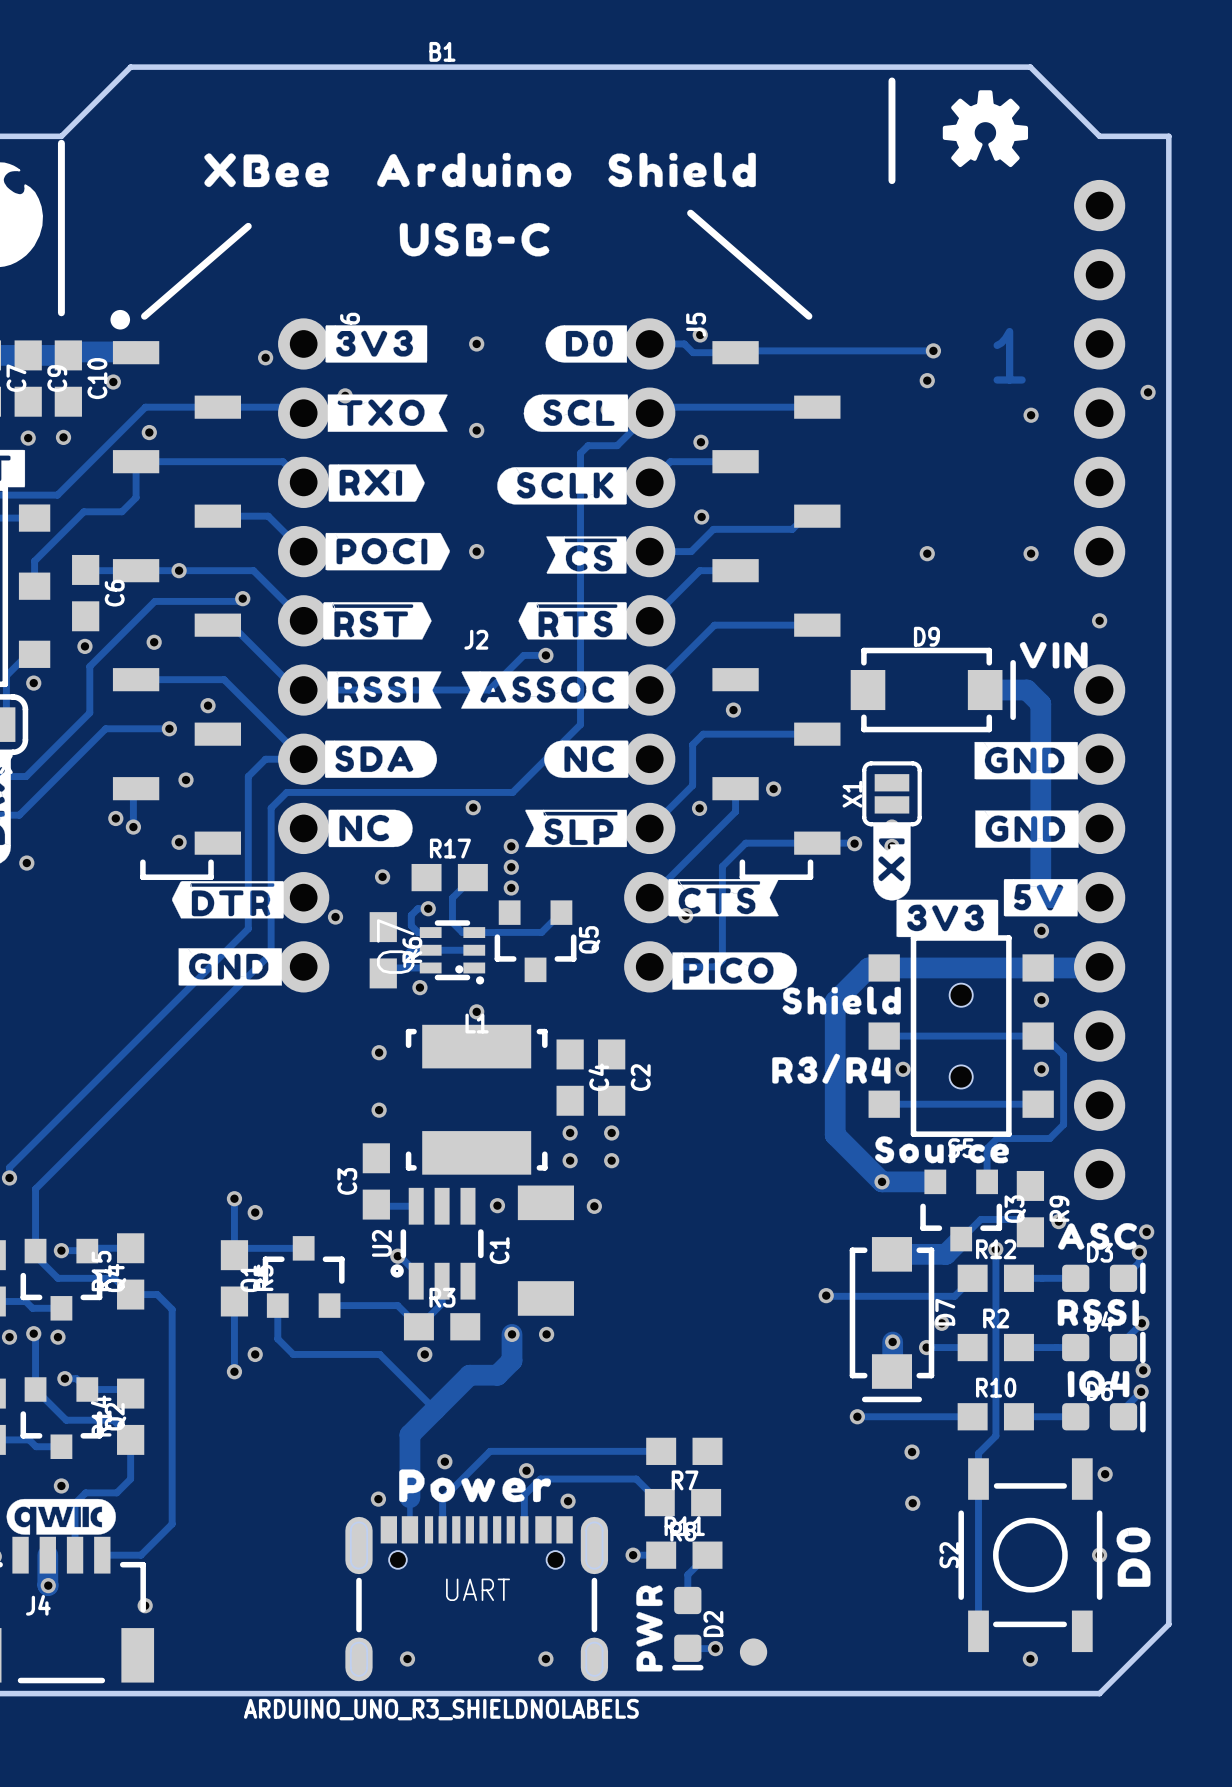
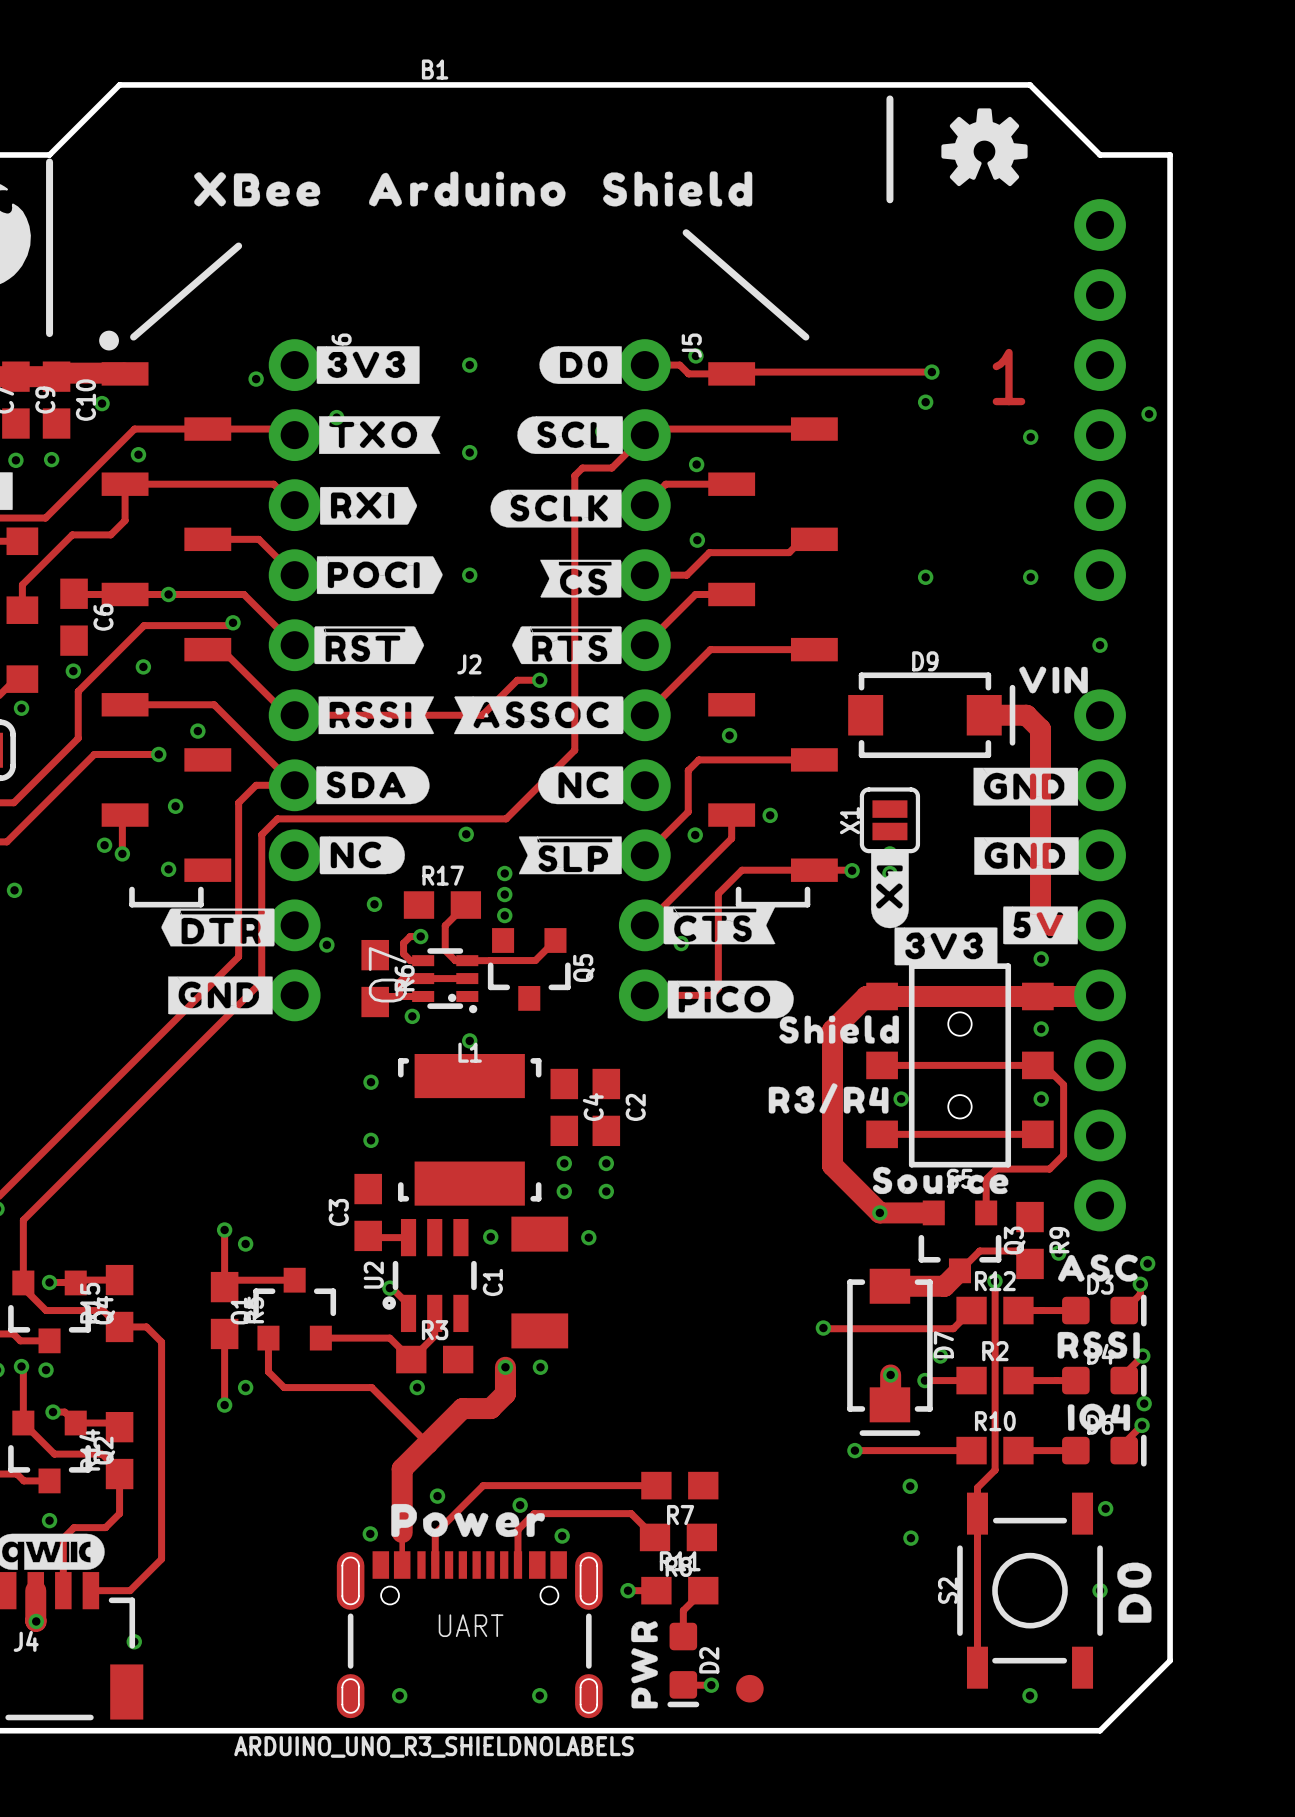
drawing: [399, 222, 550, 257] -> none

